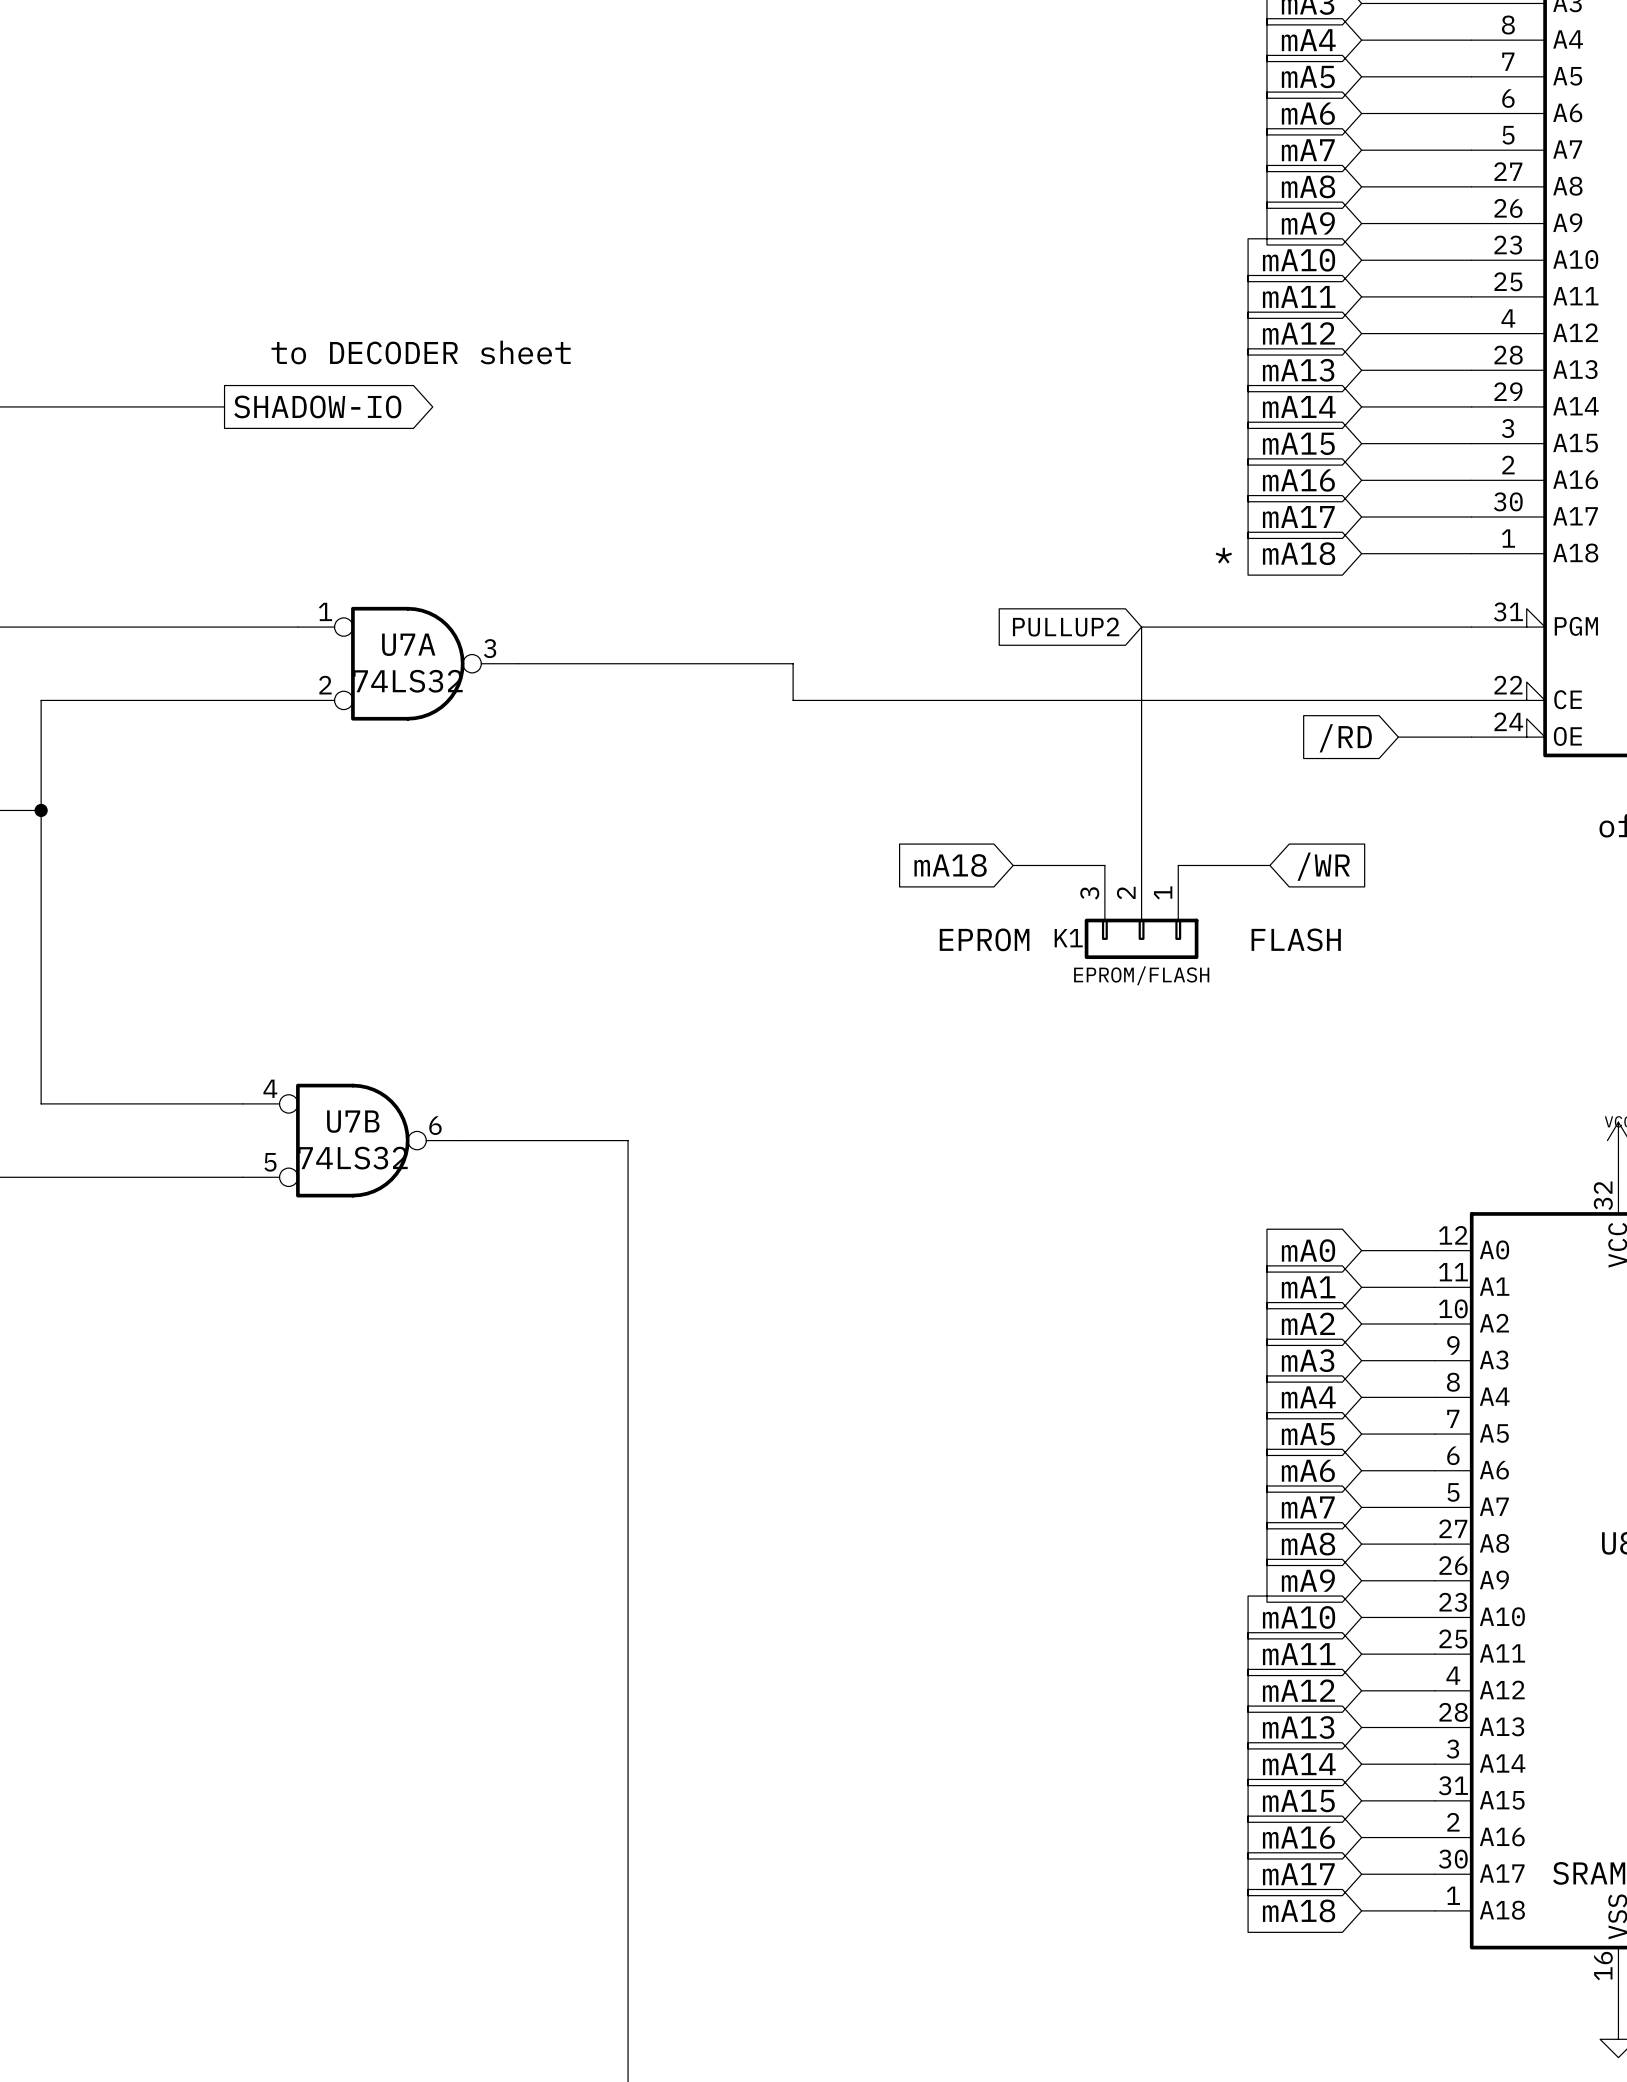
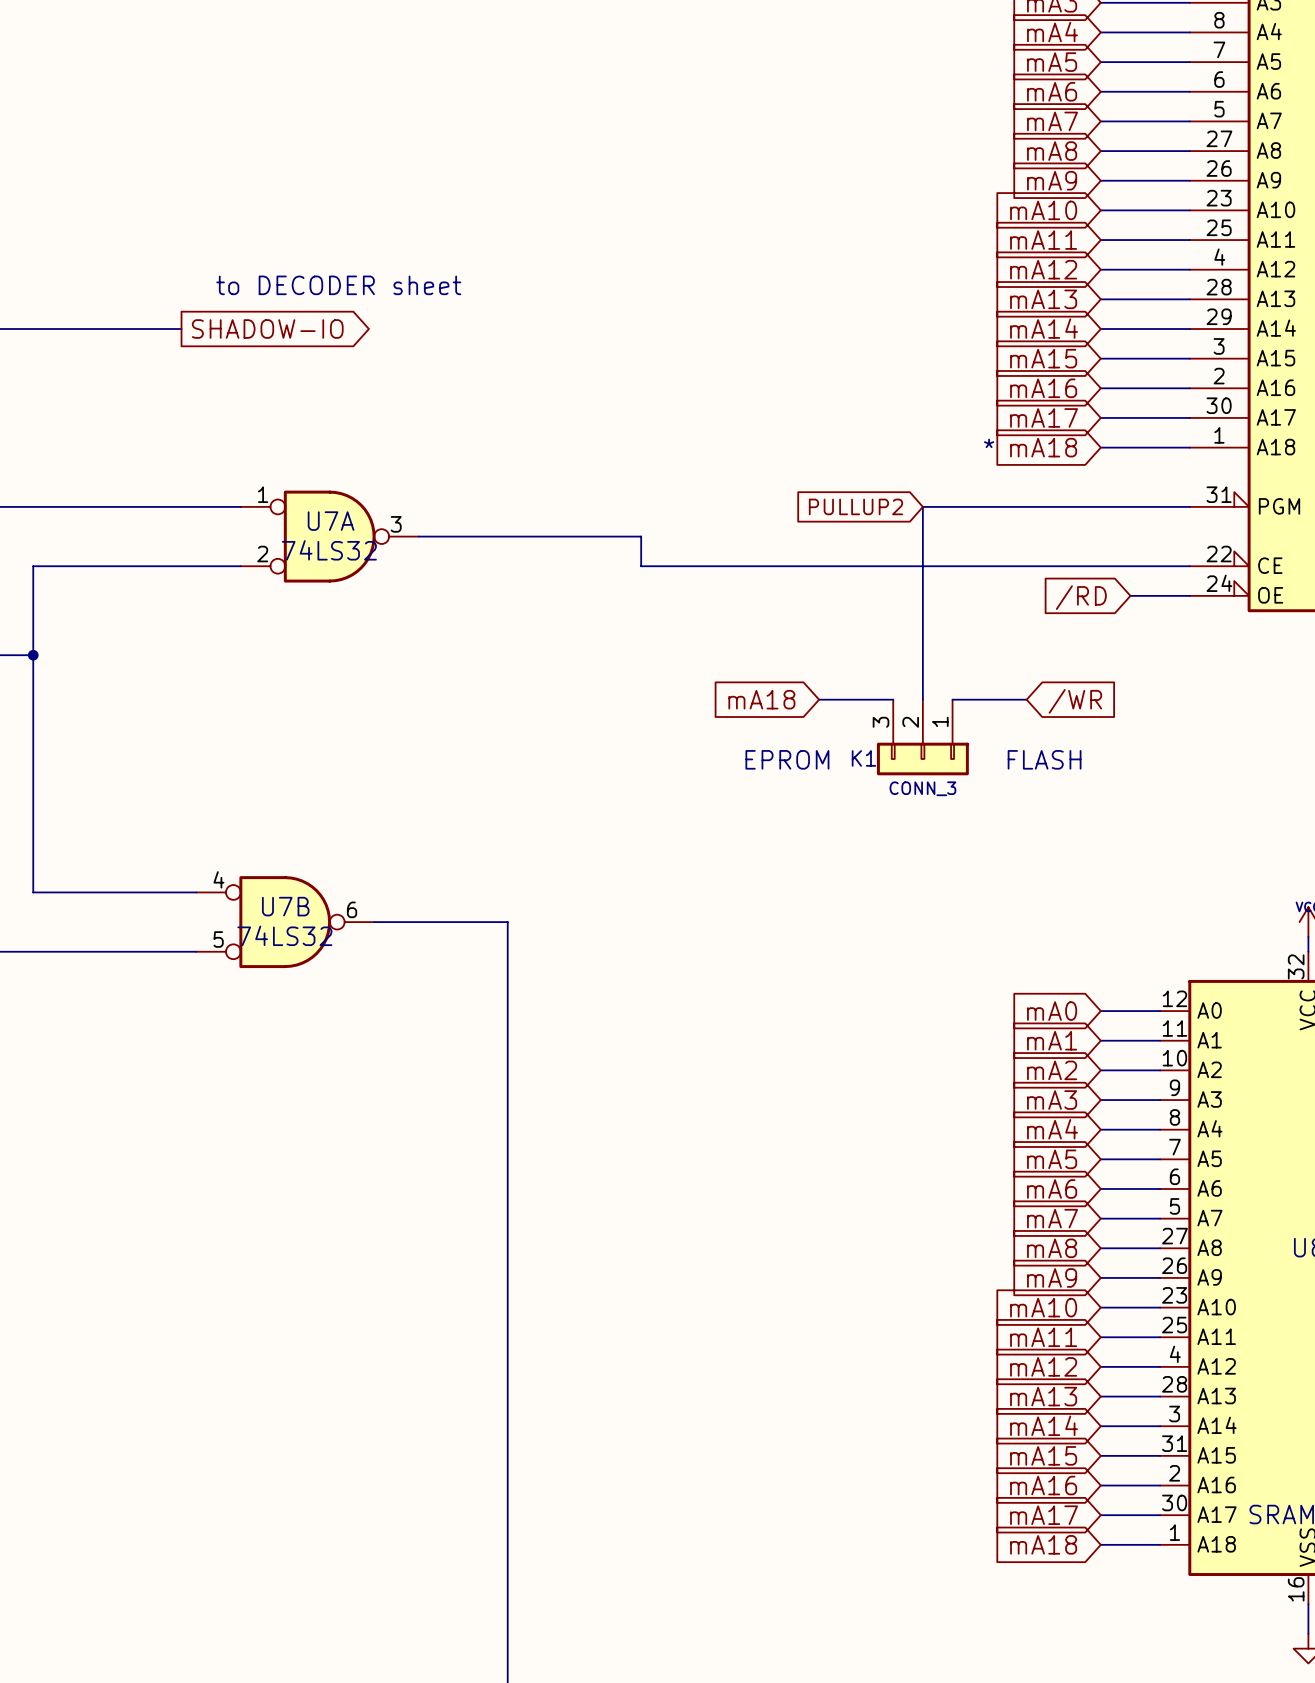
K1 value: EPROM/FLASH (1141, 975) -> CONN_3 (922, 788)

